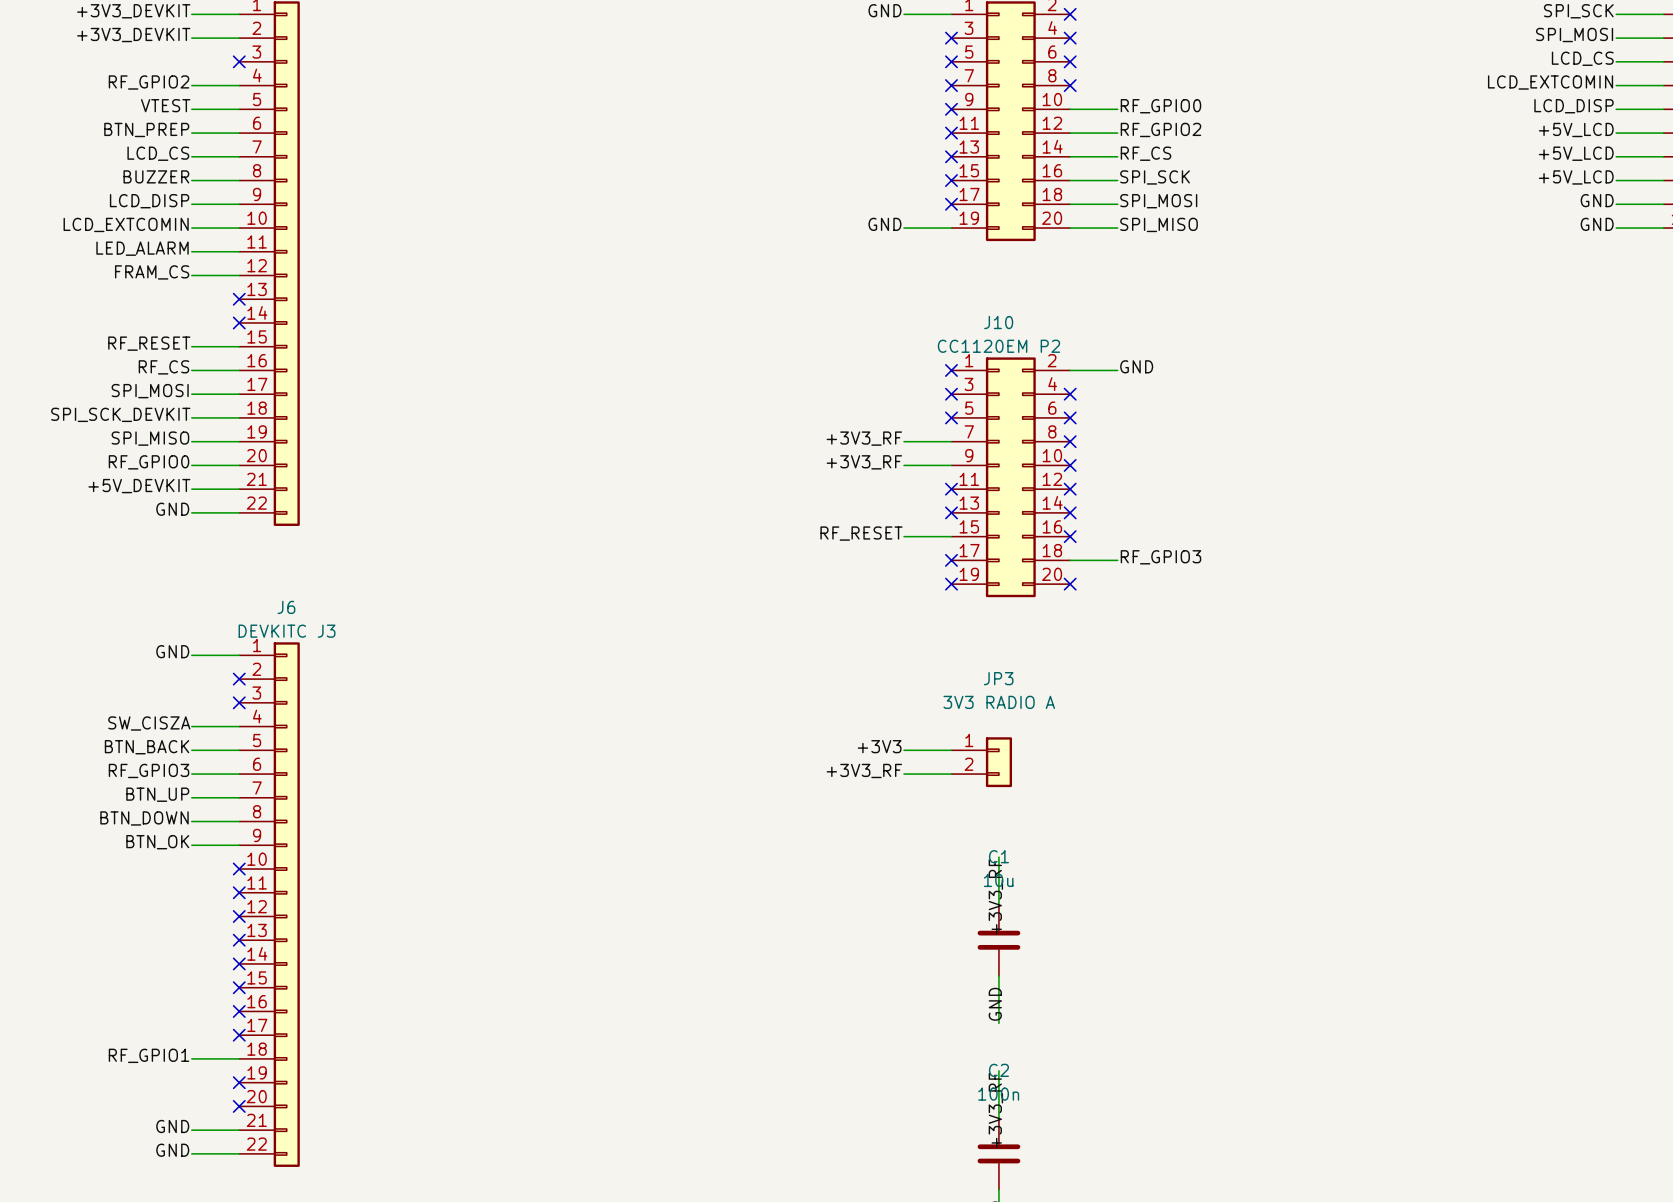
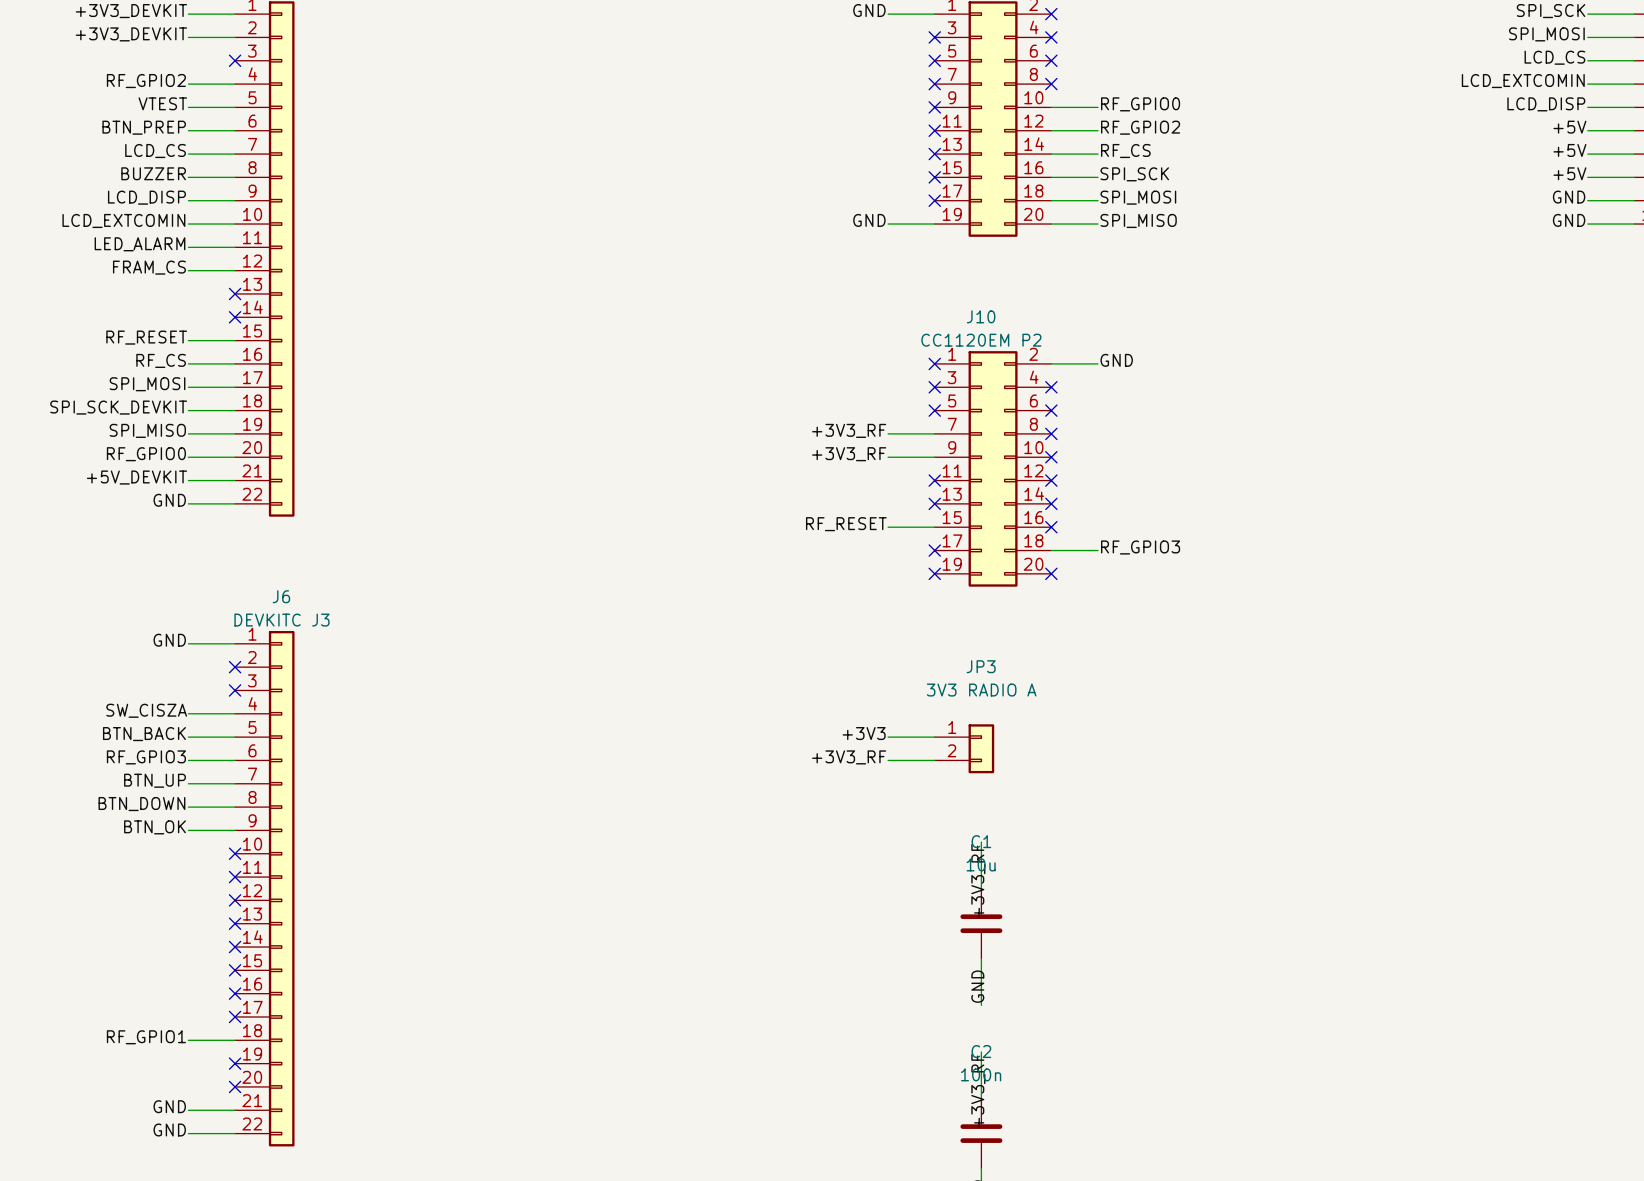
label: +5V_LCD (1576, 129) -> +5V (1569, 127)
label: +5V_LCD (1576, 153) -> +5V (1569, 150)
label: +5V_LCD (1576, 177) -> +5V (1569, 173)

